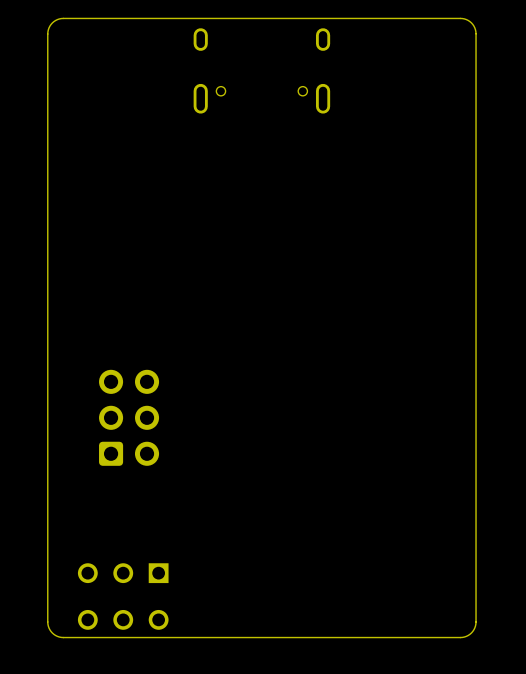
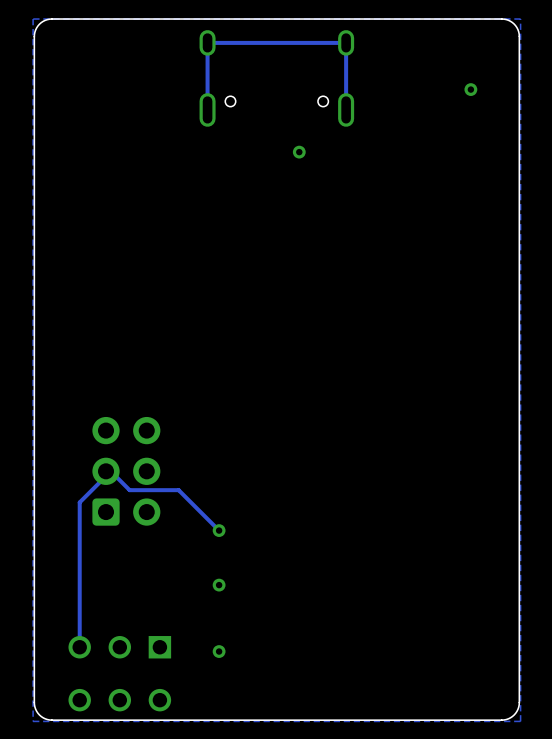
zone outline: none -> (520, 19) (520, 721) (33, 721) (33, 19) (520, 19)
via: none -> (470, 89)
track: none -> (346, 109) (346, 42) (207, 42) (207, 109)
via: none -> (299, 152)
track: none -> (219, 530) (178, 490) (129, 490) (110, 471) (79, 502) (79, 647)
via: none -> (219, 530)
via: none -> (219, 585)
via: none -> (219, 651)

